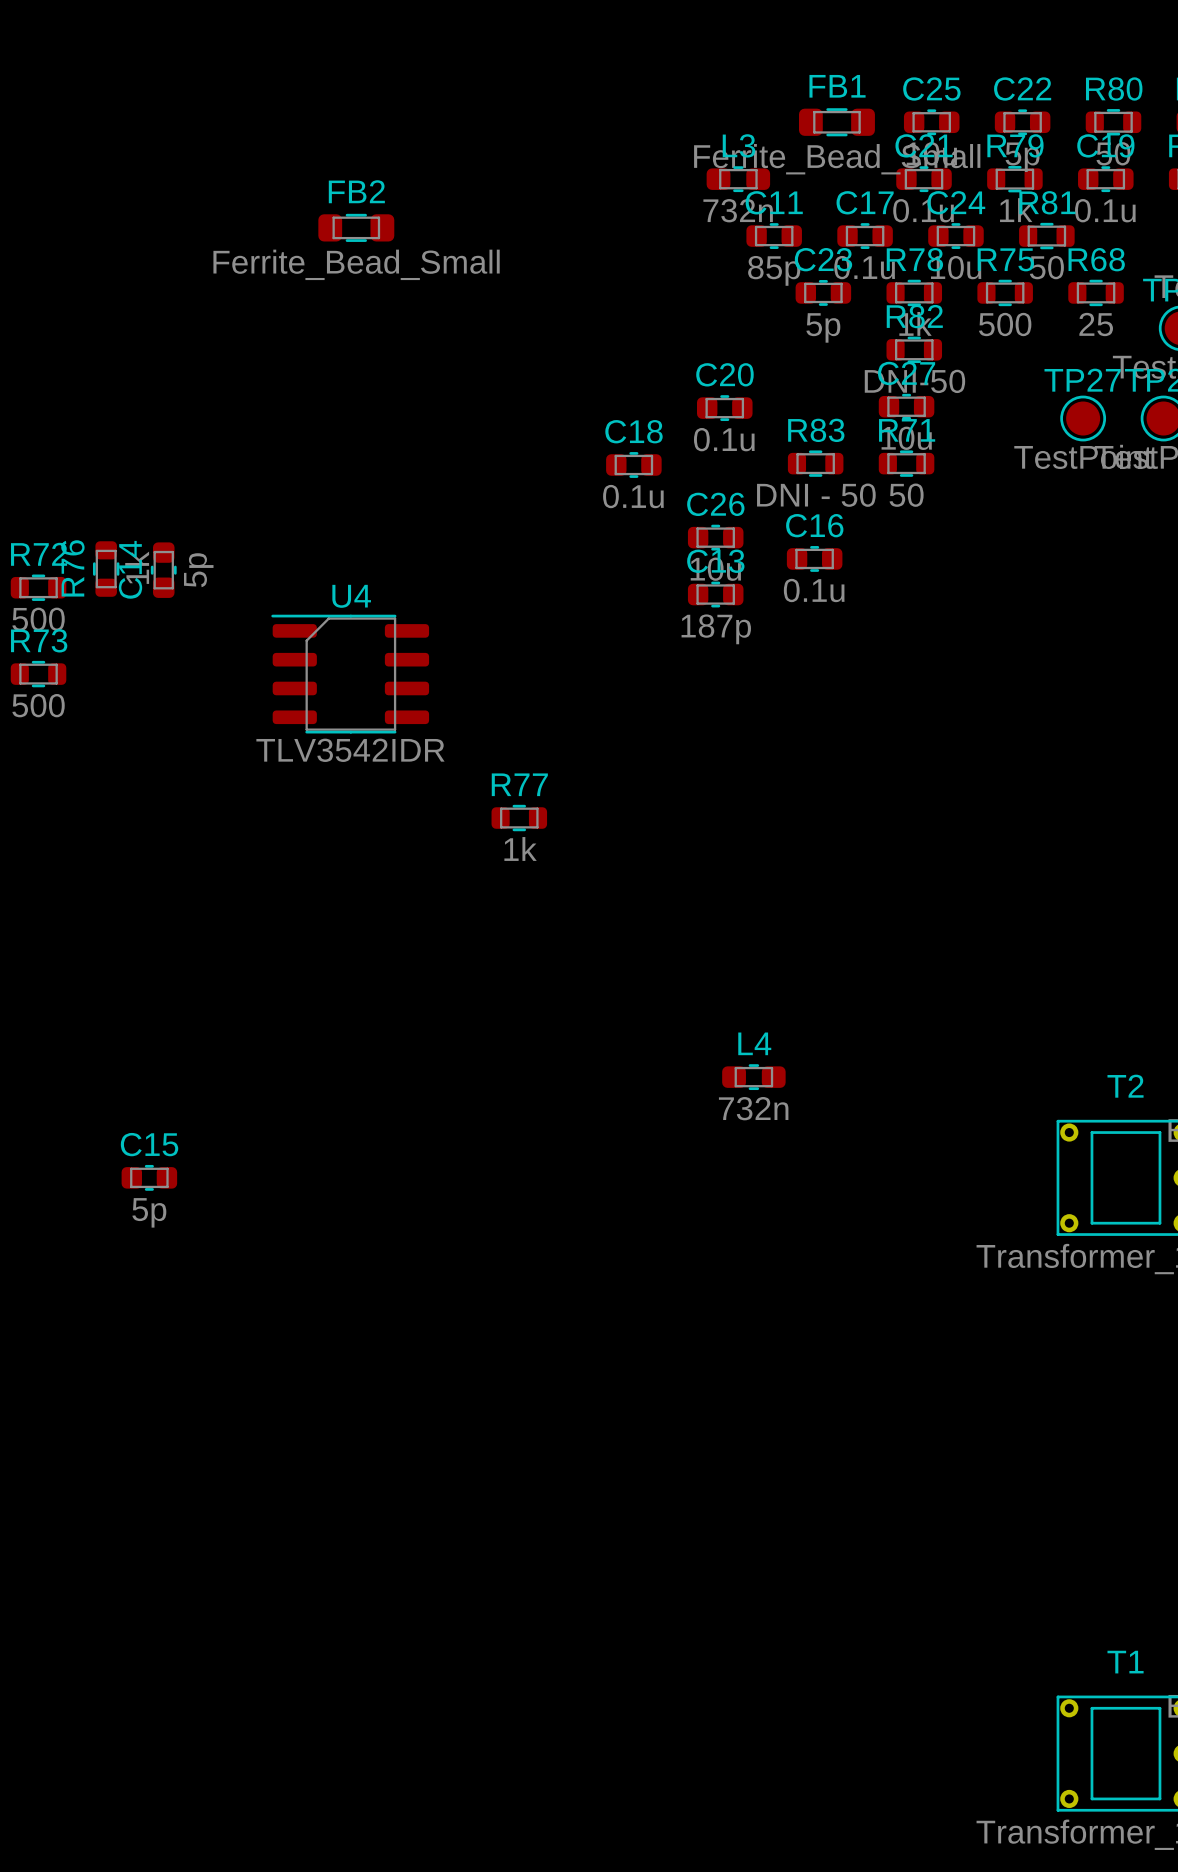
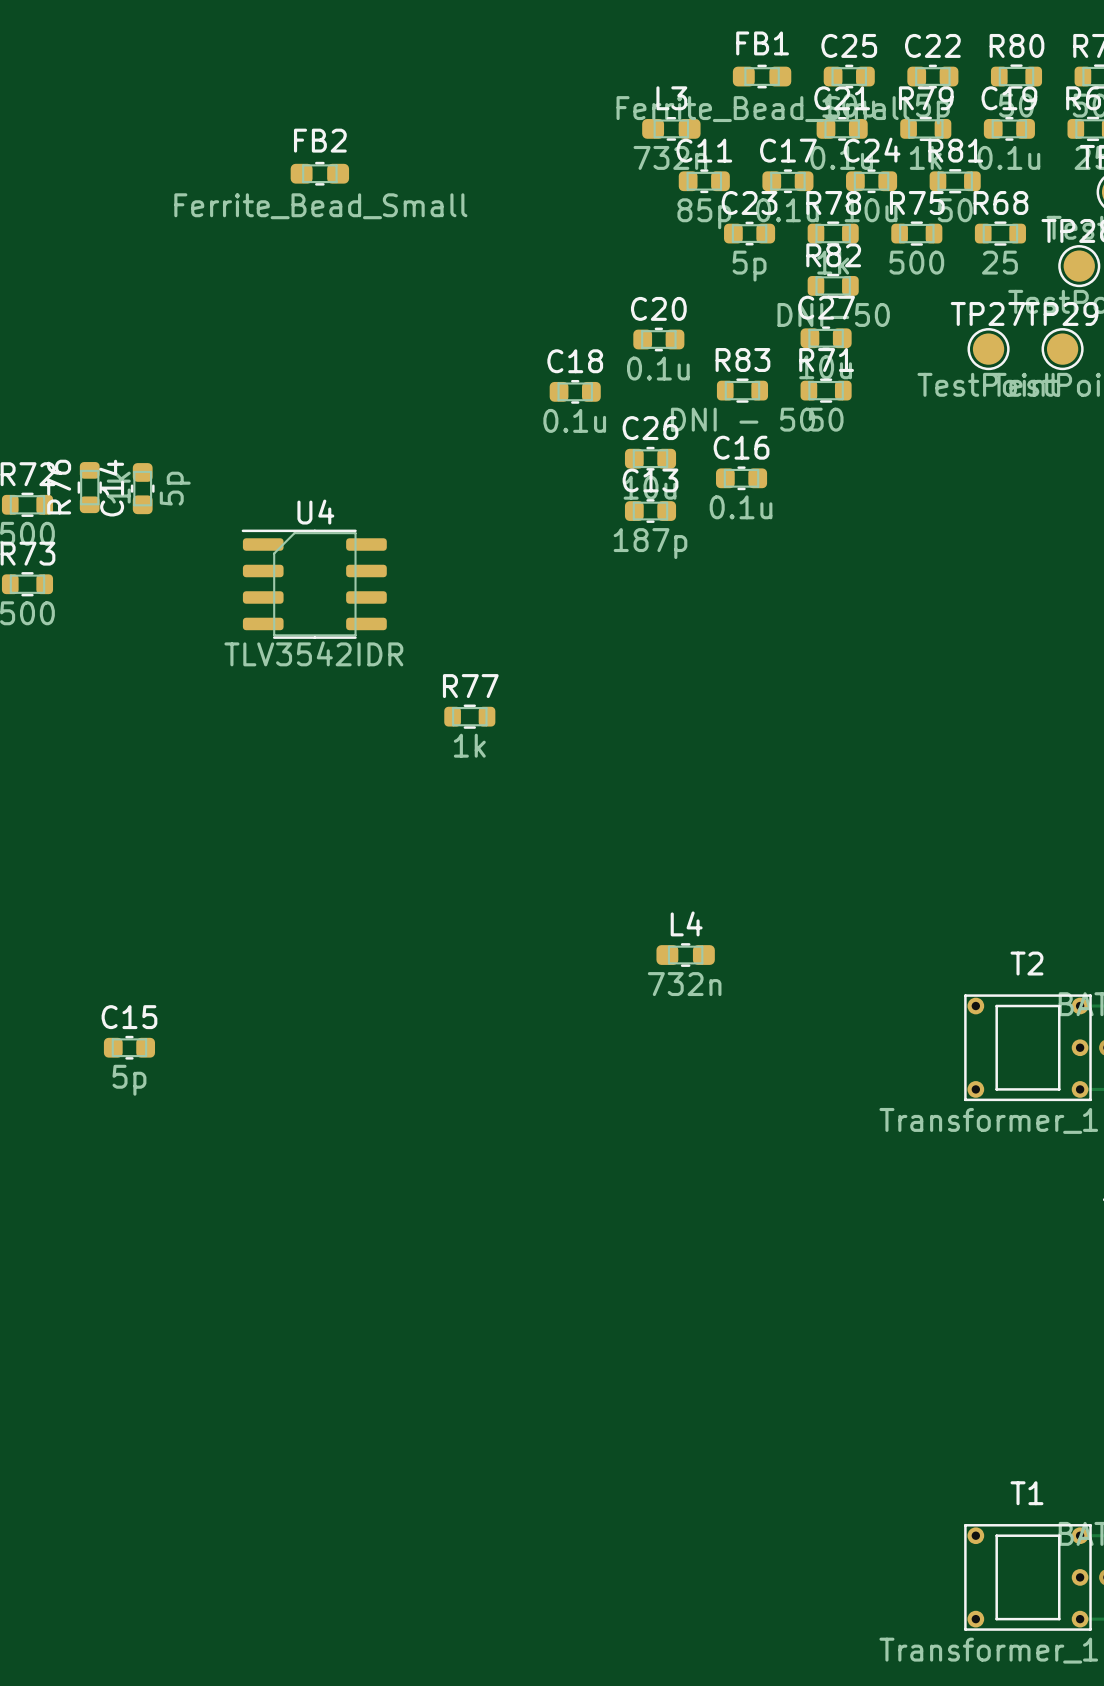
FB1 footprint: [799, 108, 875, 137] -> [732, 64, 792, 89]
FB2 footprint: [318, 213, 395, 242] -> [290, 161, 350, 186]

